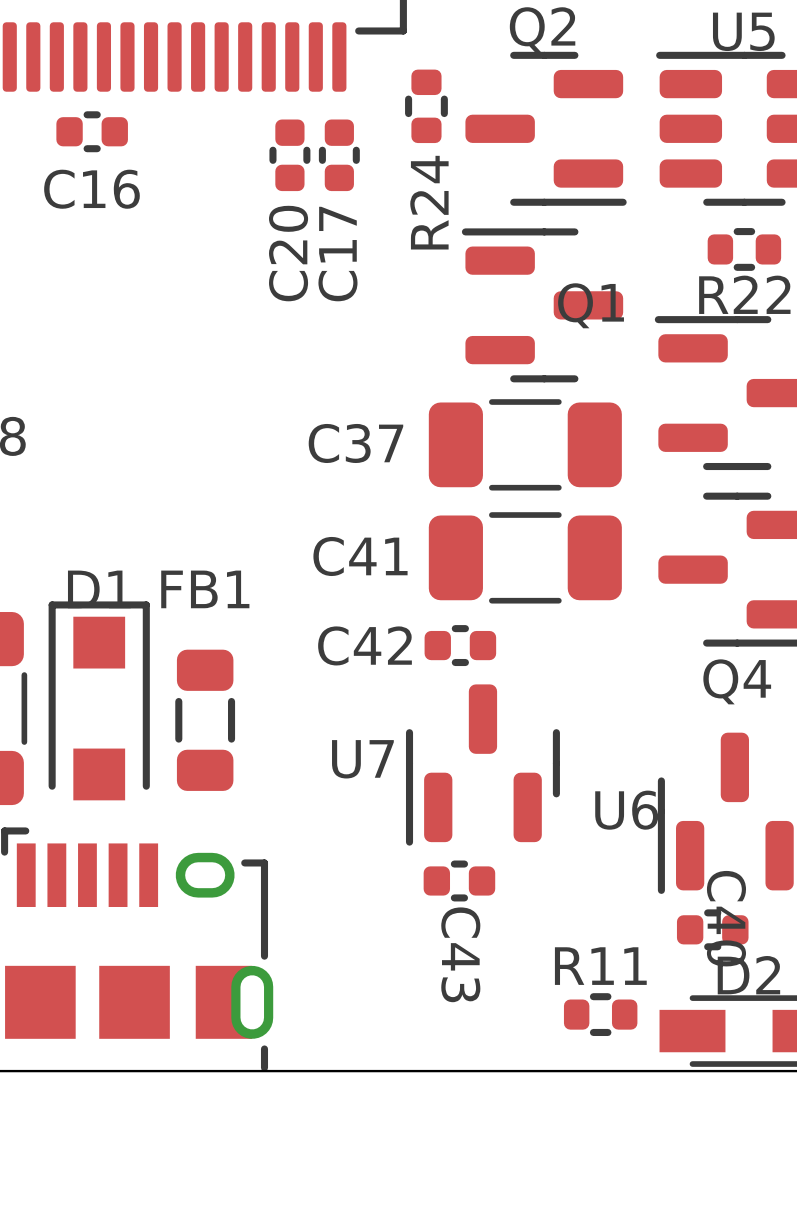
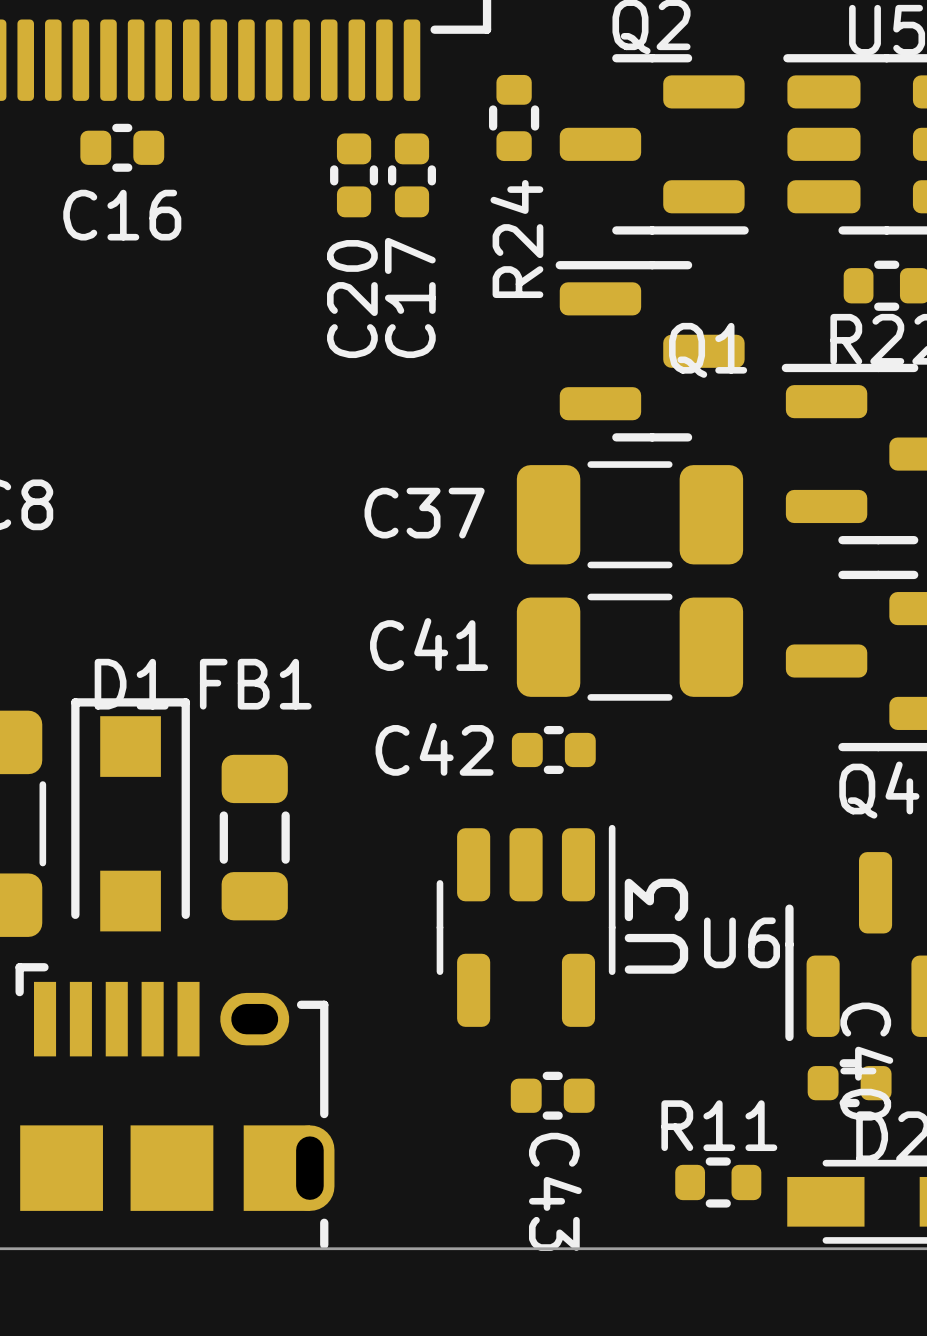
U7: (482, 765) -> none
U3: none -> (526, 925)
C43 position: (459, 880) -> (552, 1095)

